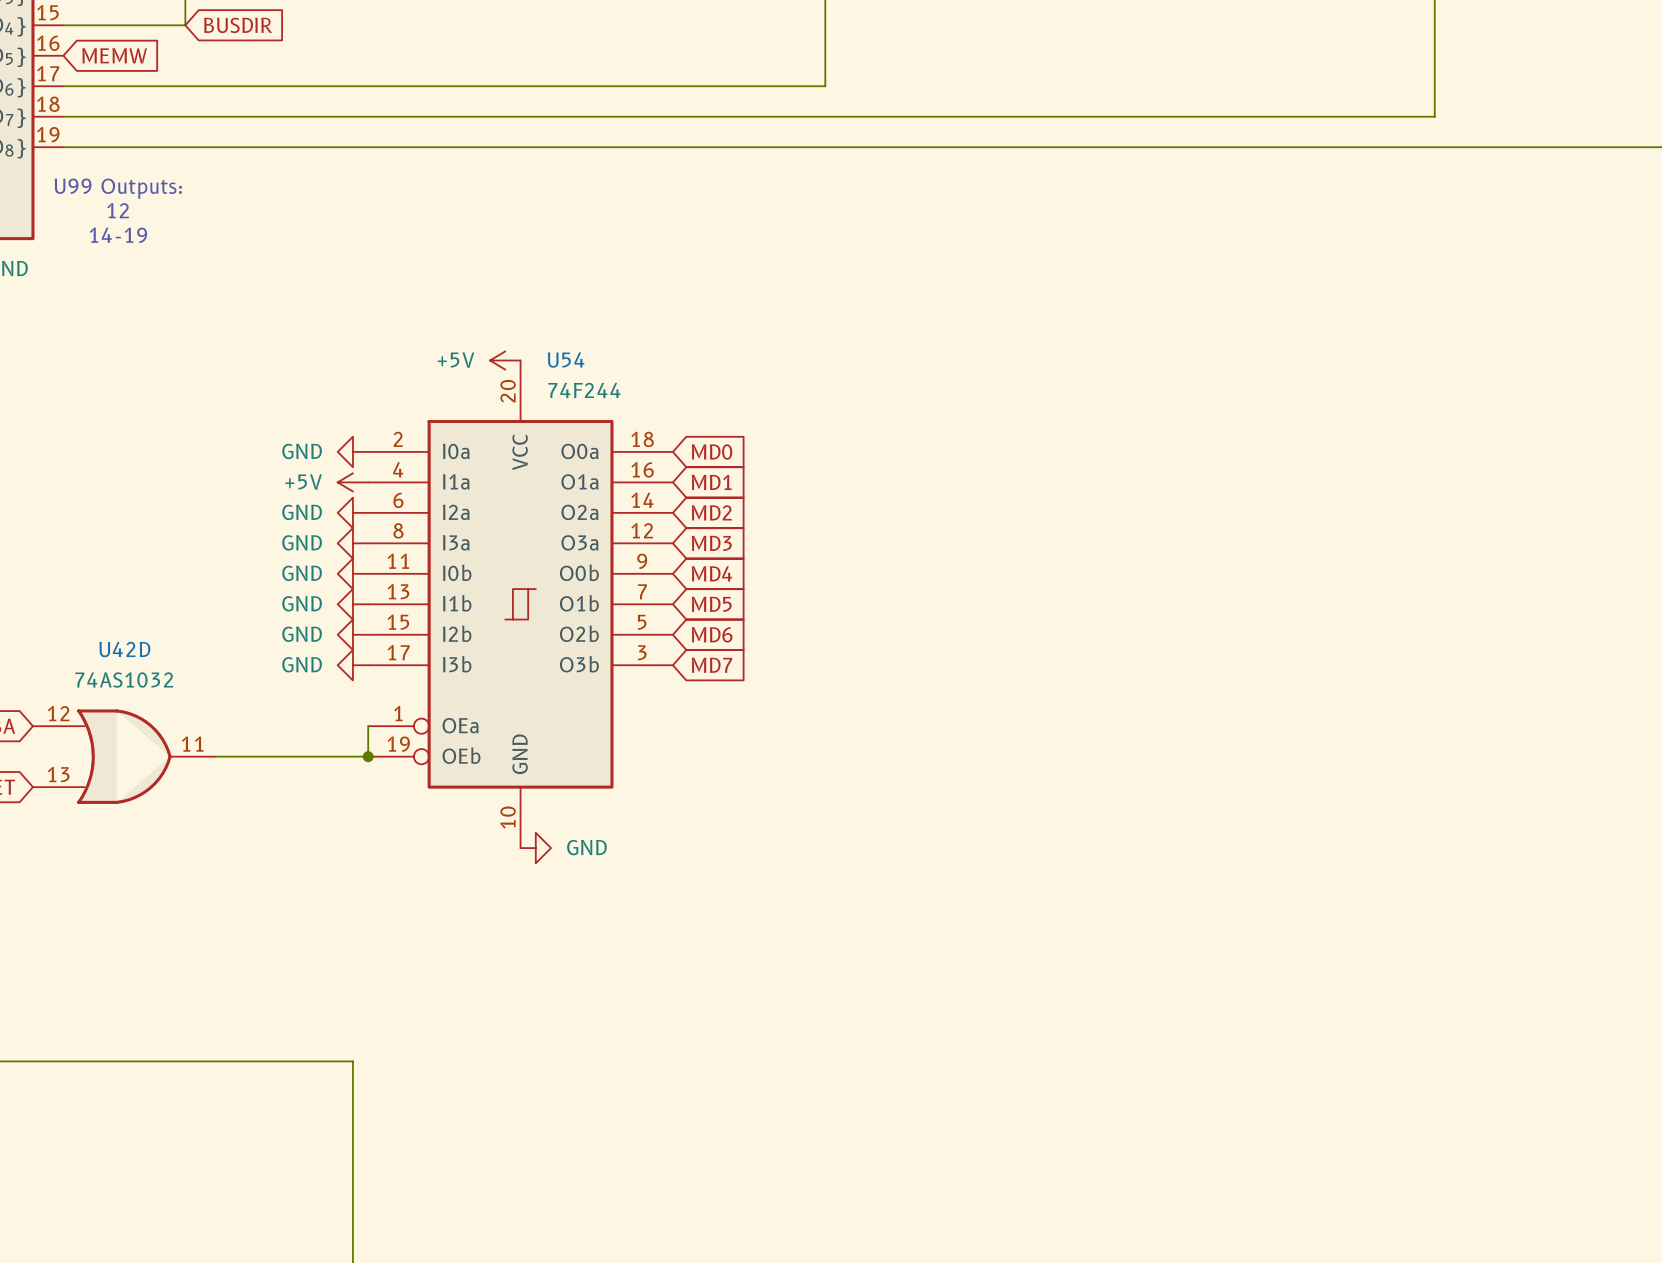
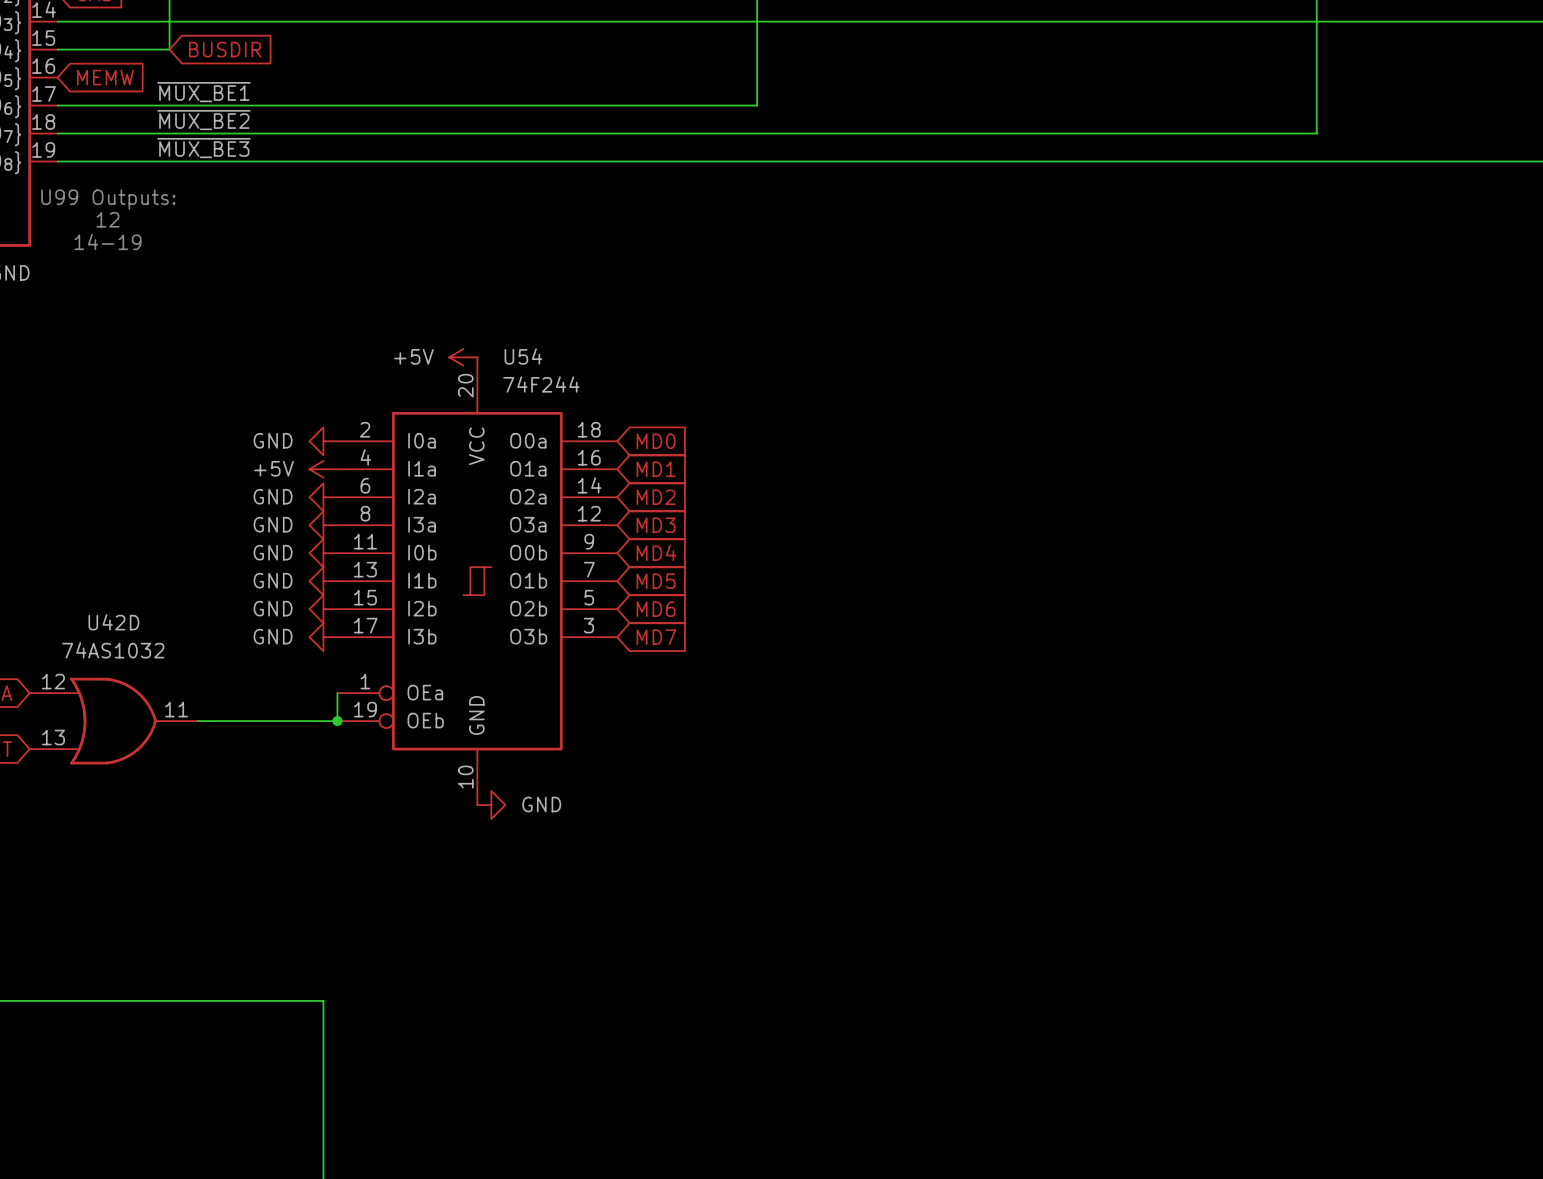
label: none -> ~{MUX_BE1} (203, 92)
label: none -> ~{MUX_BE2} (203, 120)
label: none -> ~{MUX_BE3} (203, 148)

